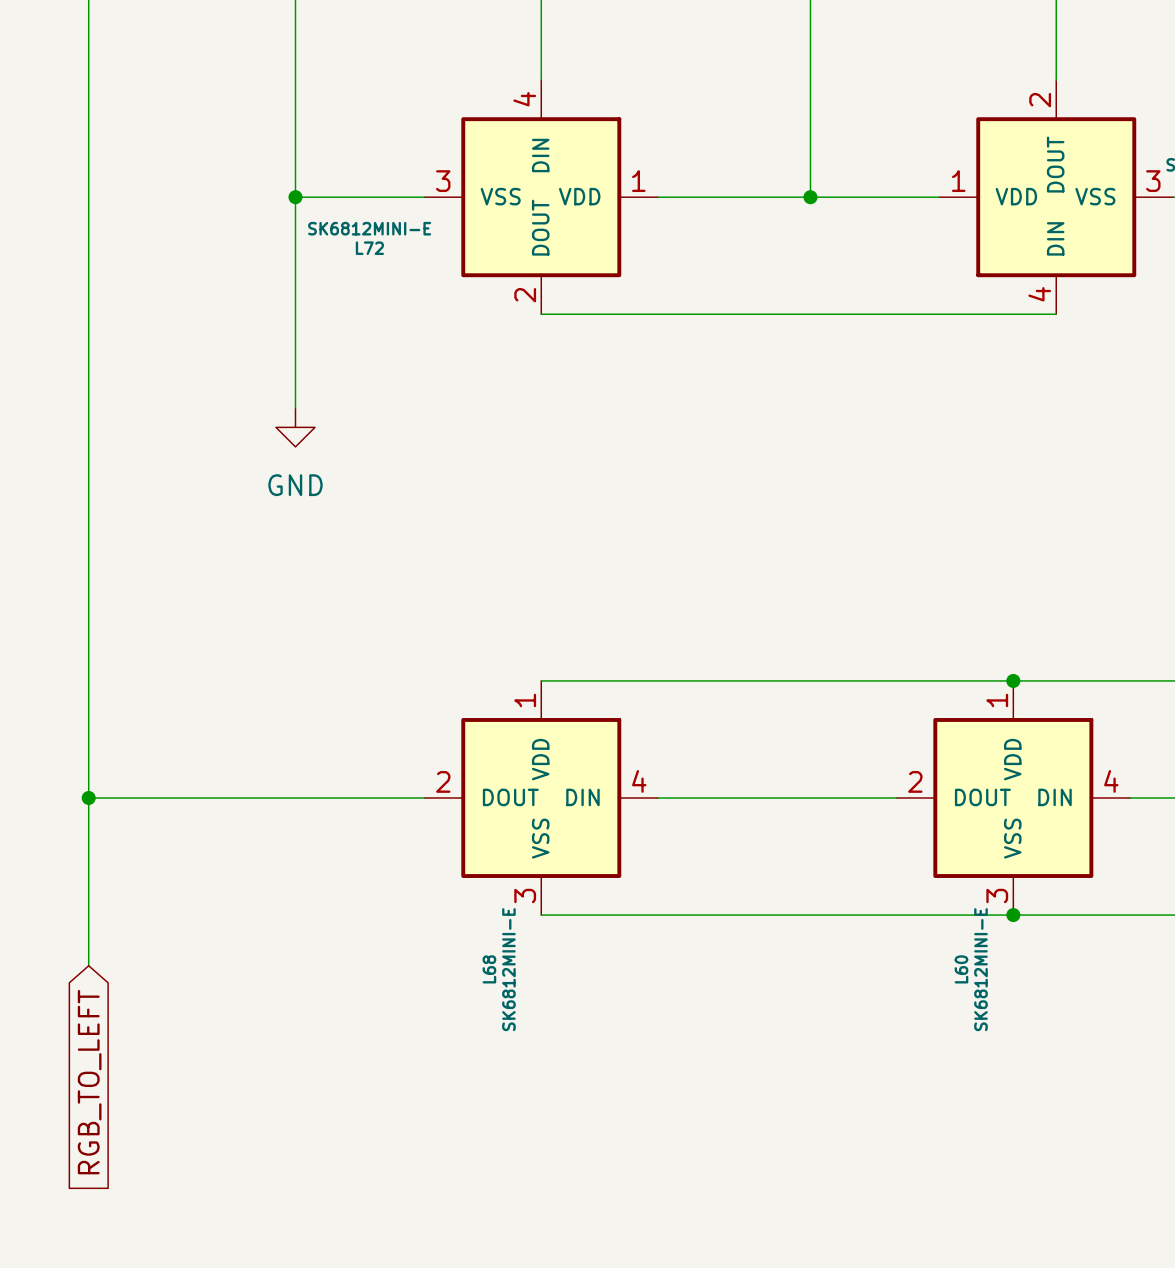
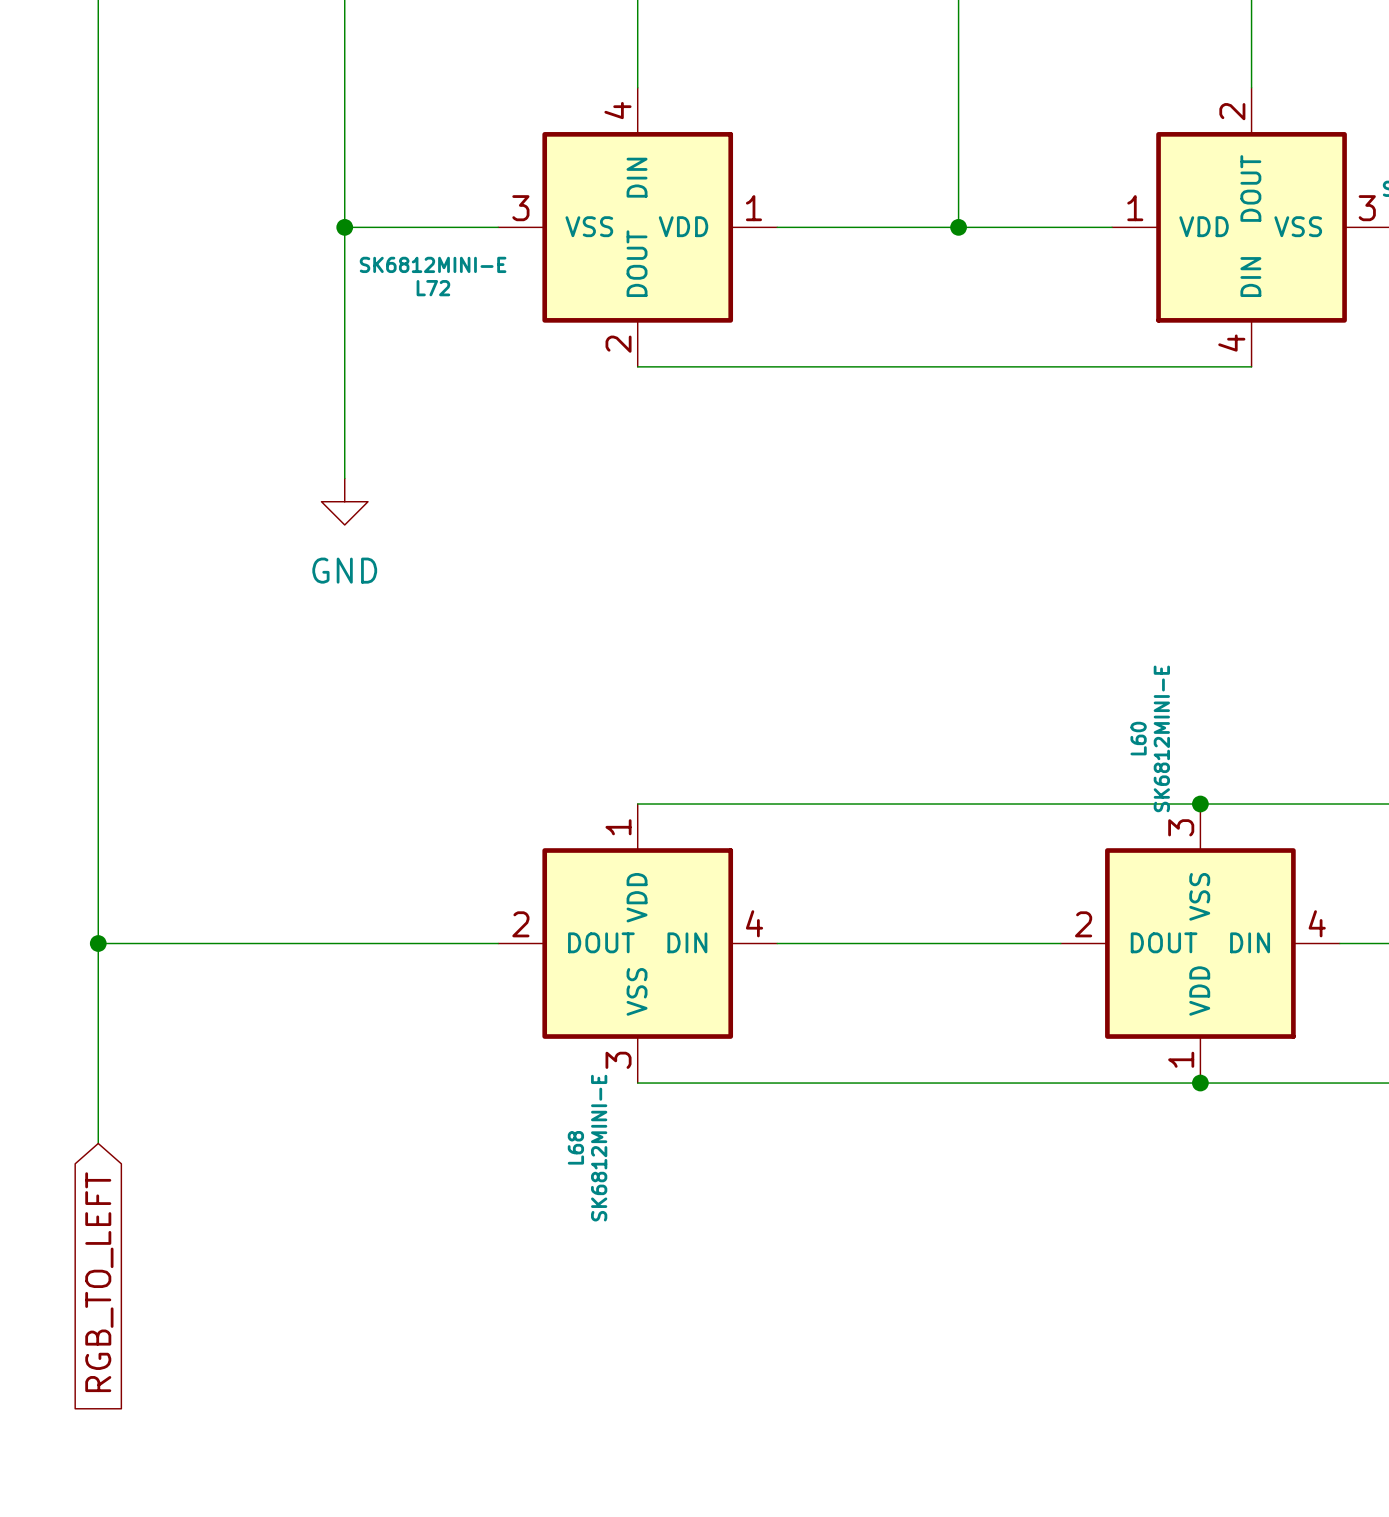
L60 flip: as is (1013, 798) -> up-down (1200, 943)

